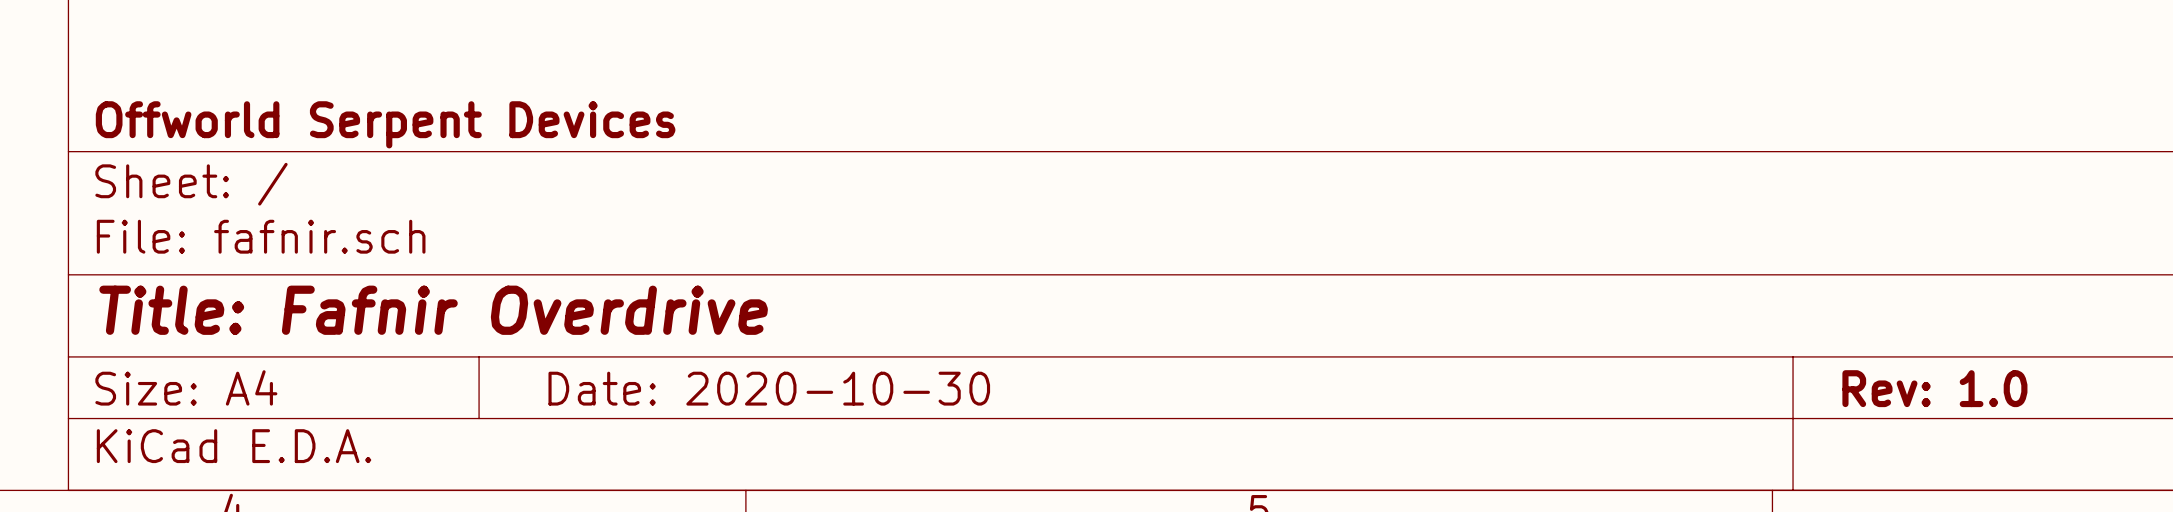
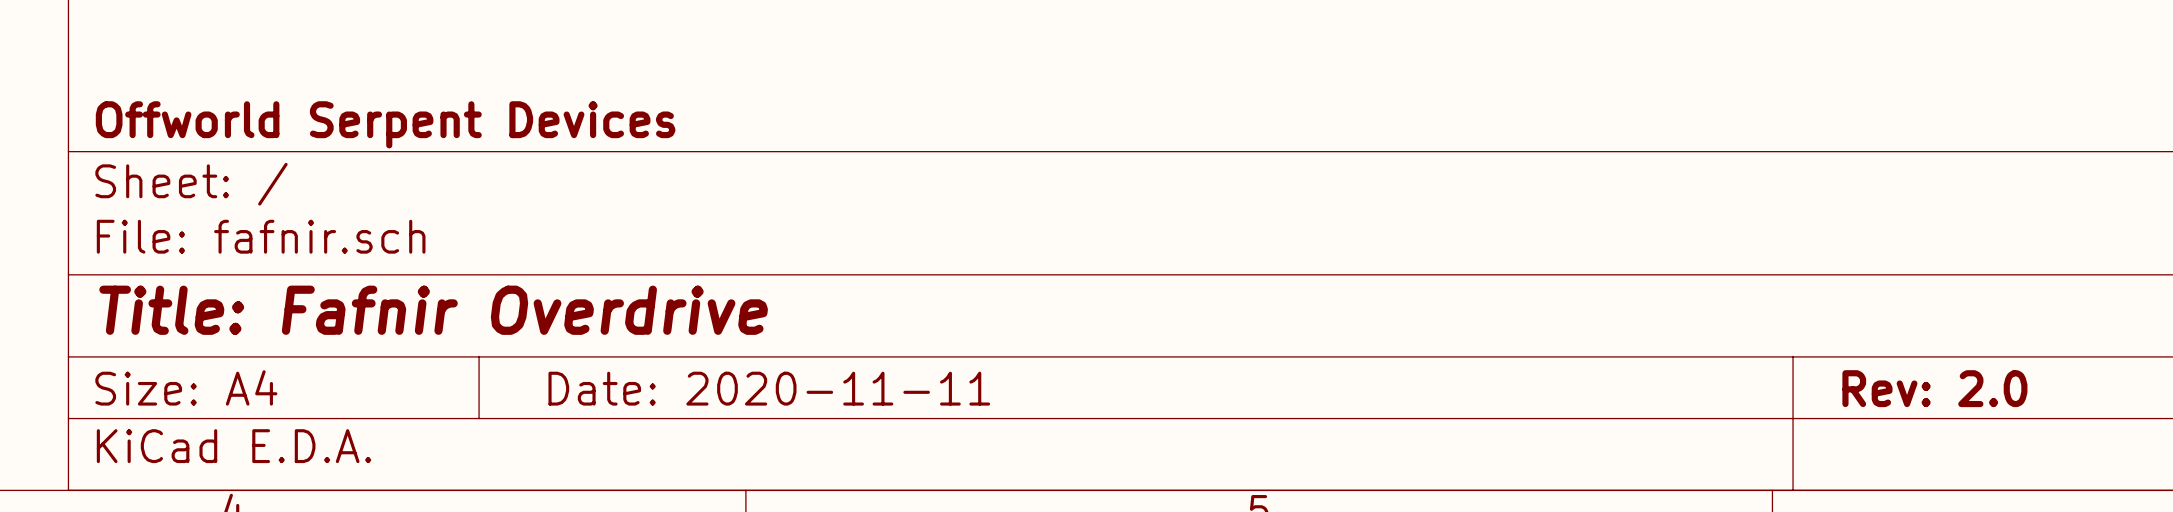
title block: Date: 2020-10-30 (769, 388) -> Date: 2020-11-11 (769, 388)
title block: Rev: 1.0 (1934, 388) -> Rev: 2.0 (1934, 388)

